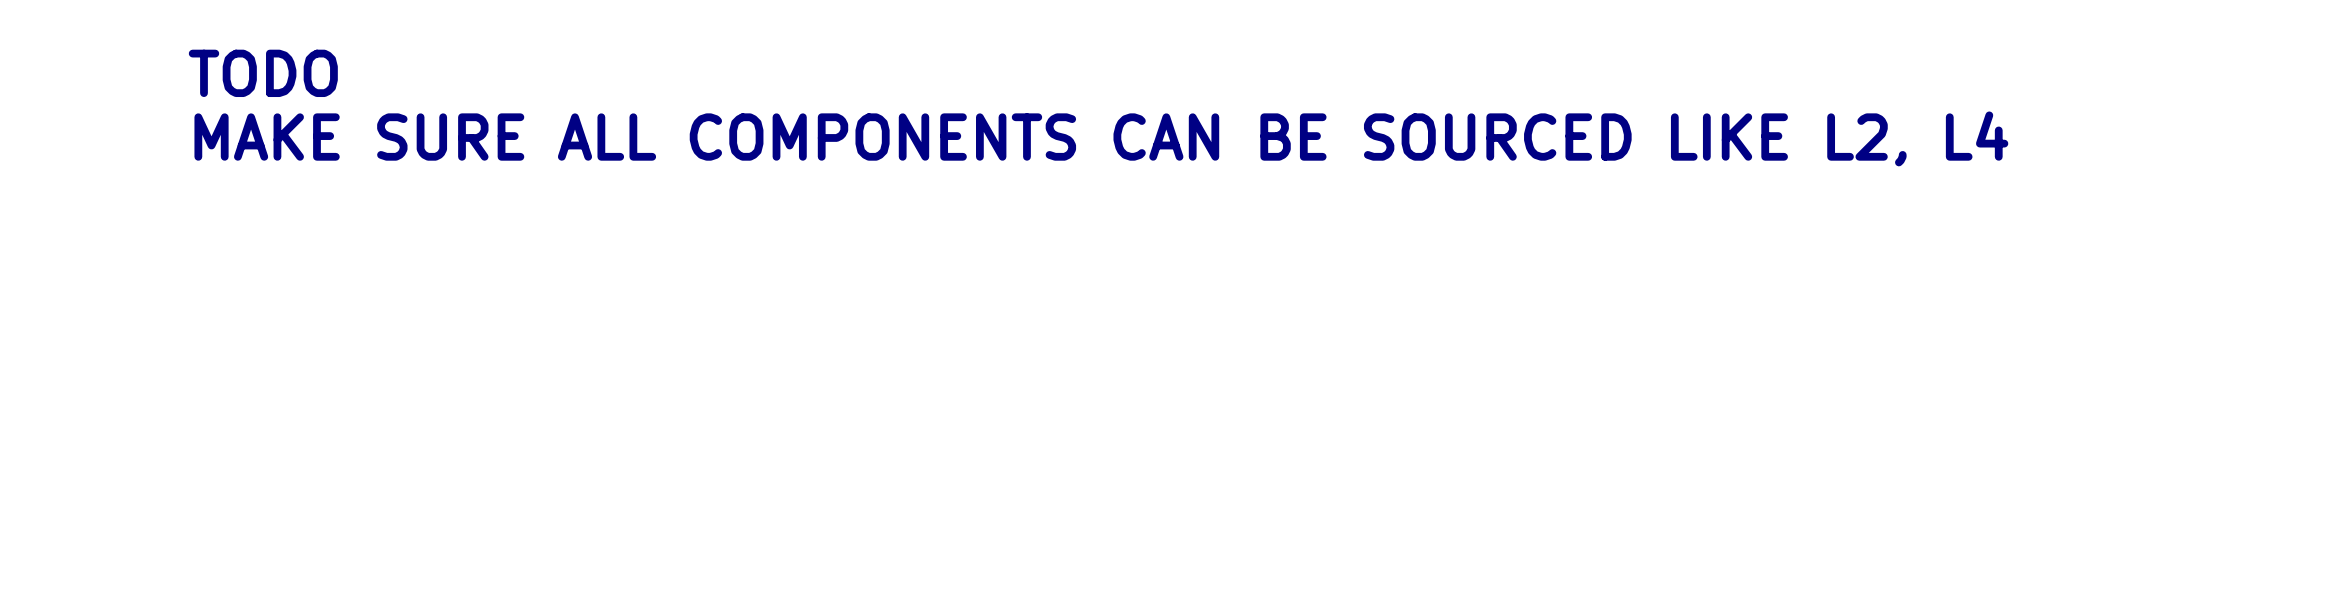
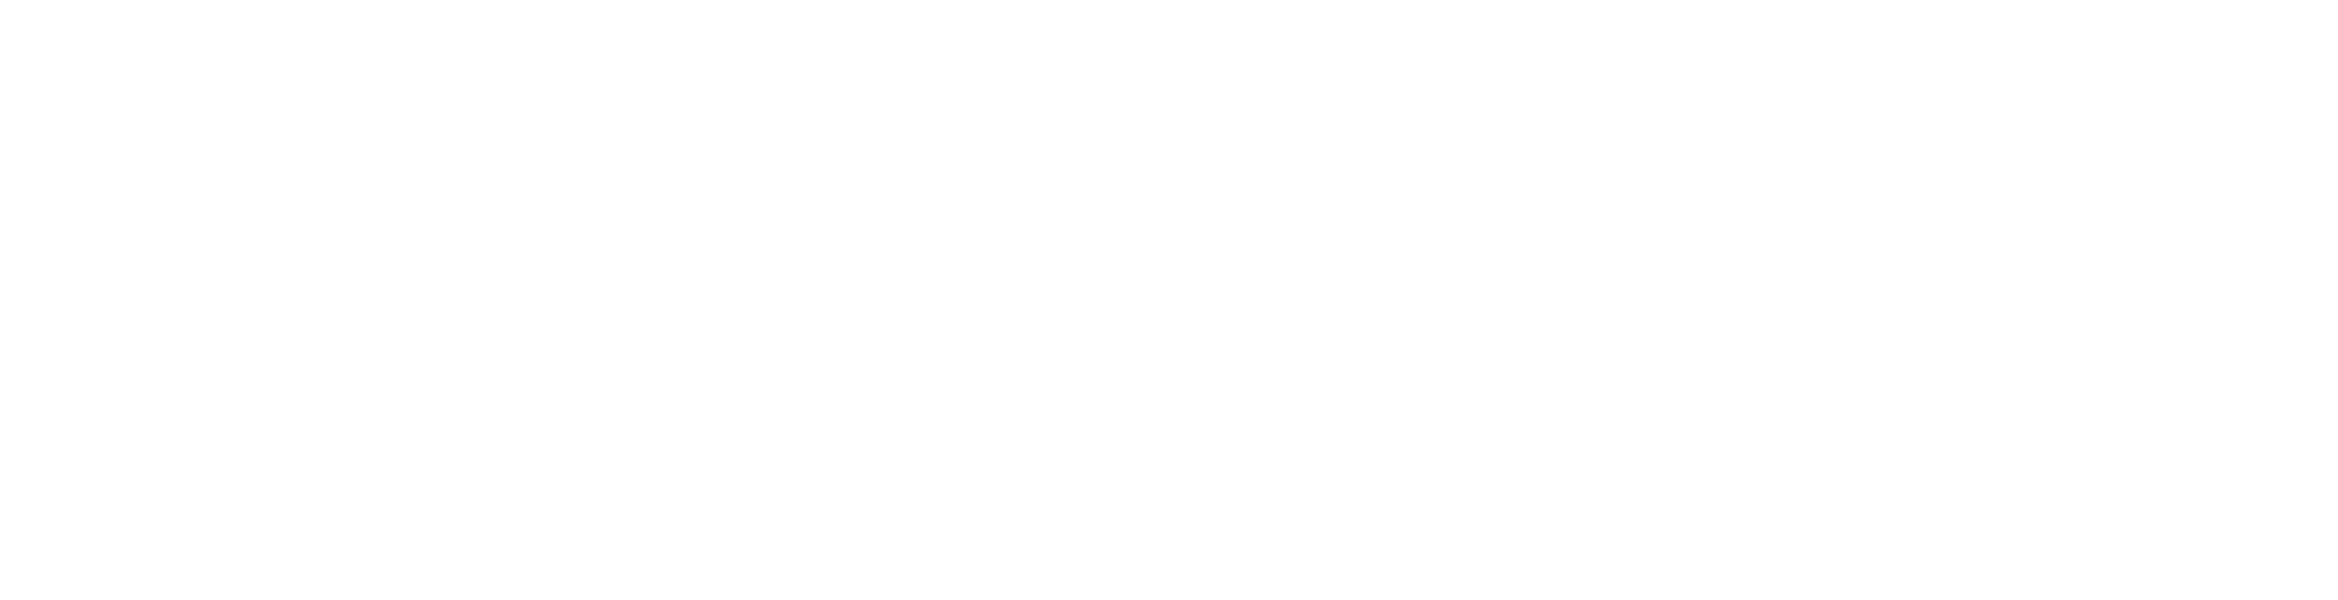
text: TODO (263, 73) -> none
text: MAKE SURE ALL COMPONENTS CAN BE SOURCED LIKE L2, L4 (1101, 138) -> none

